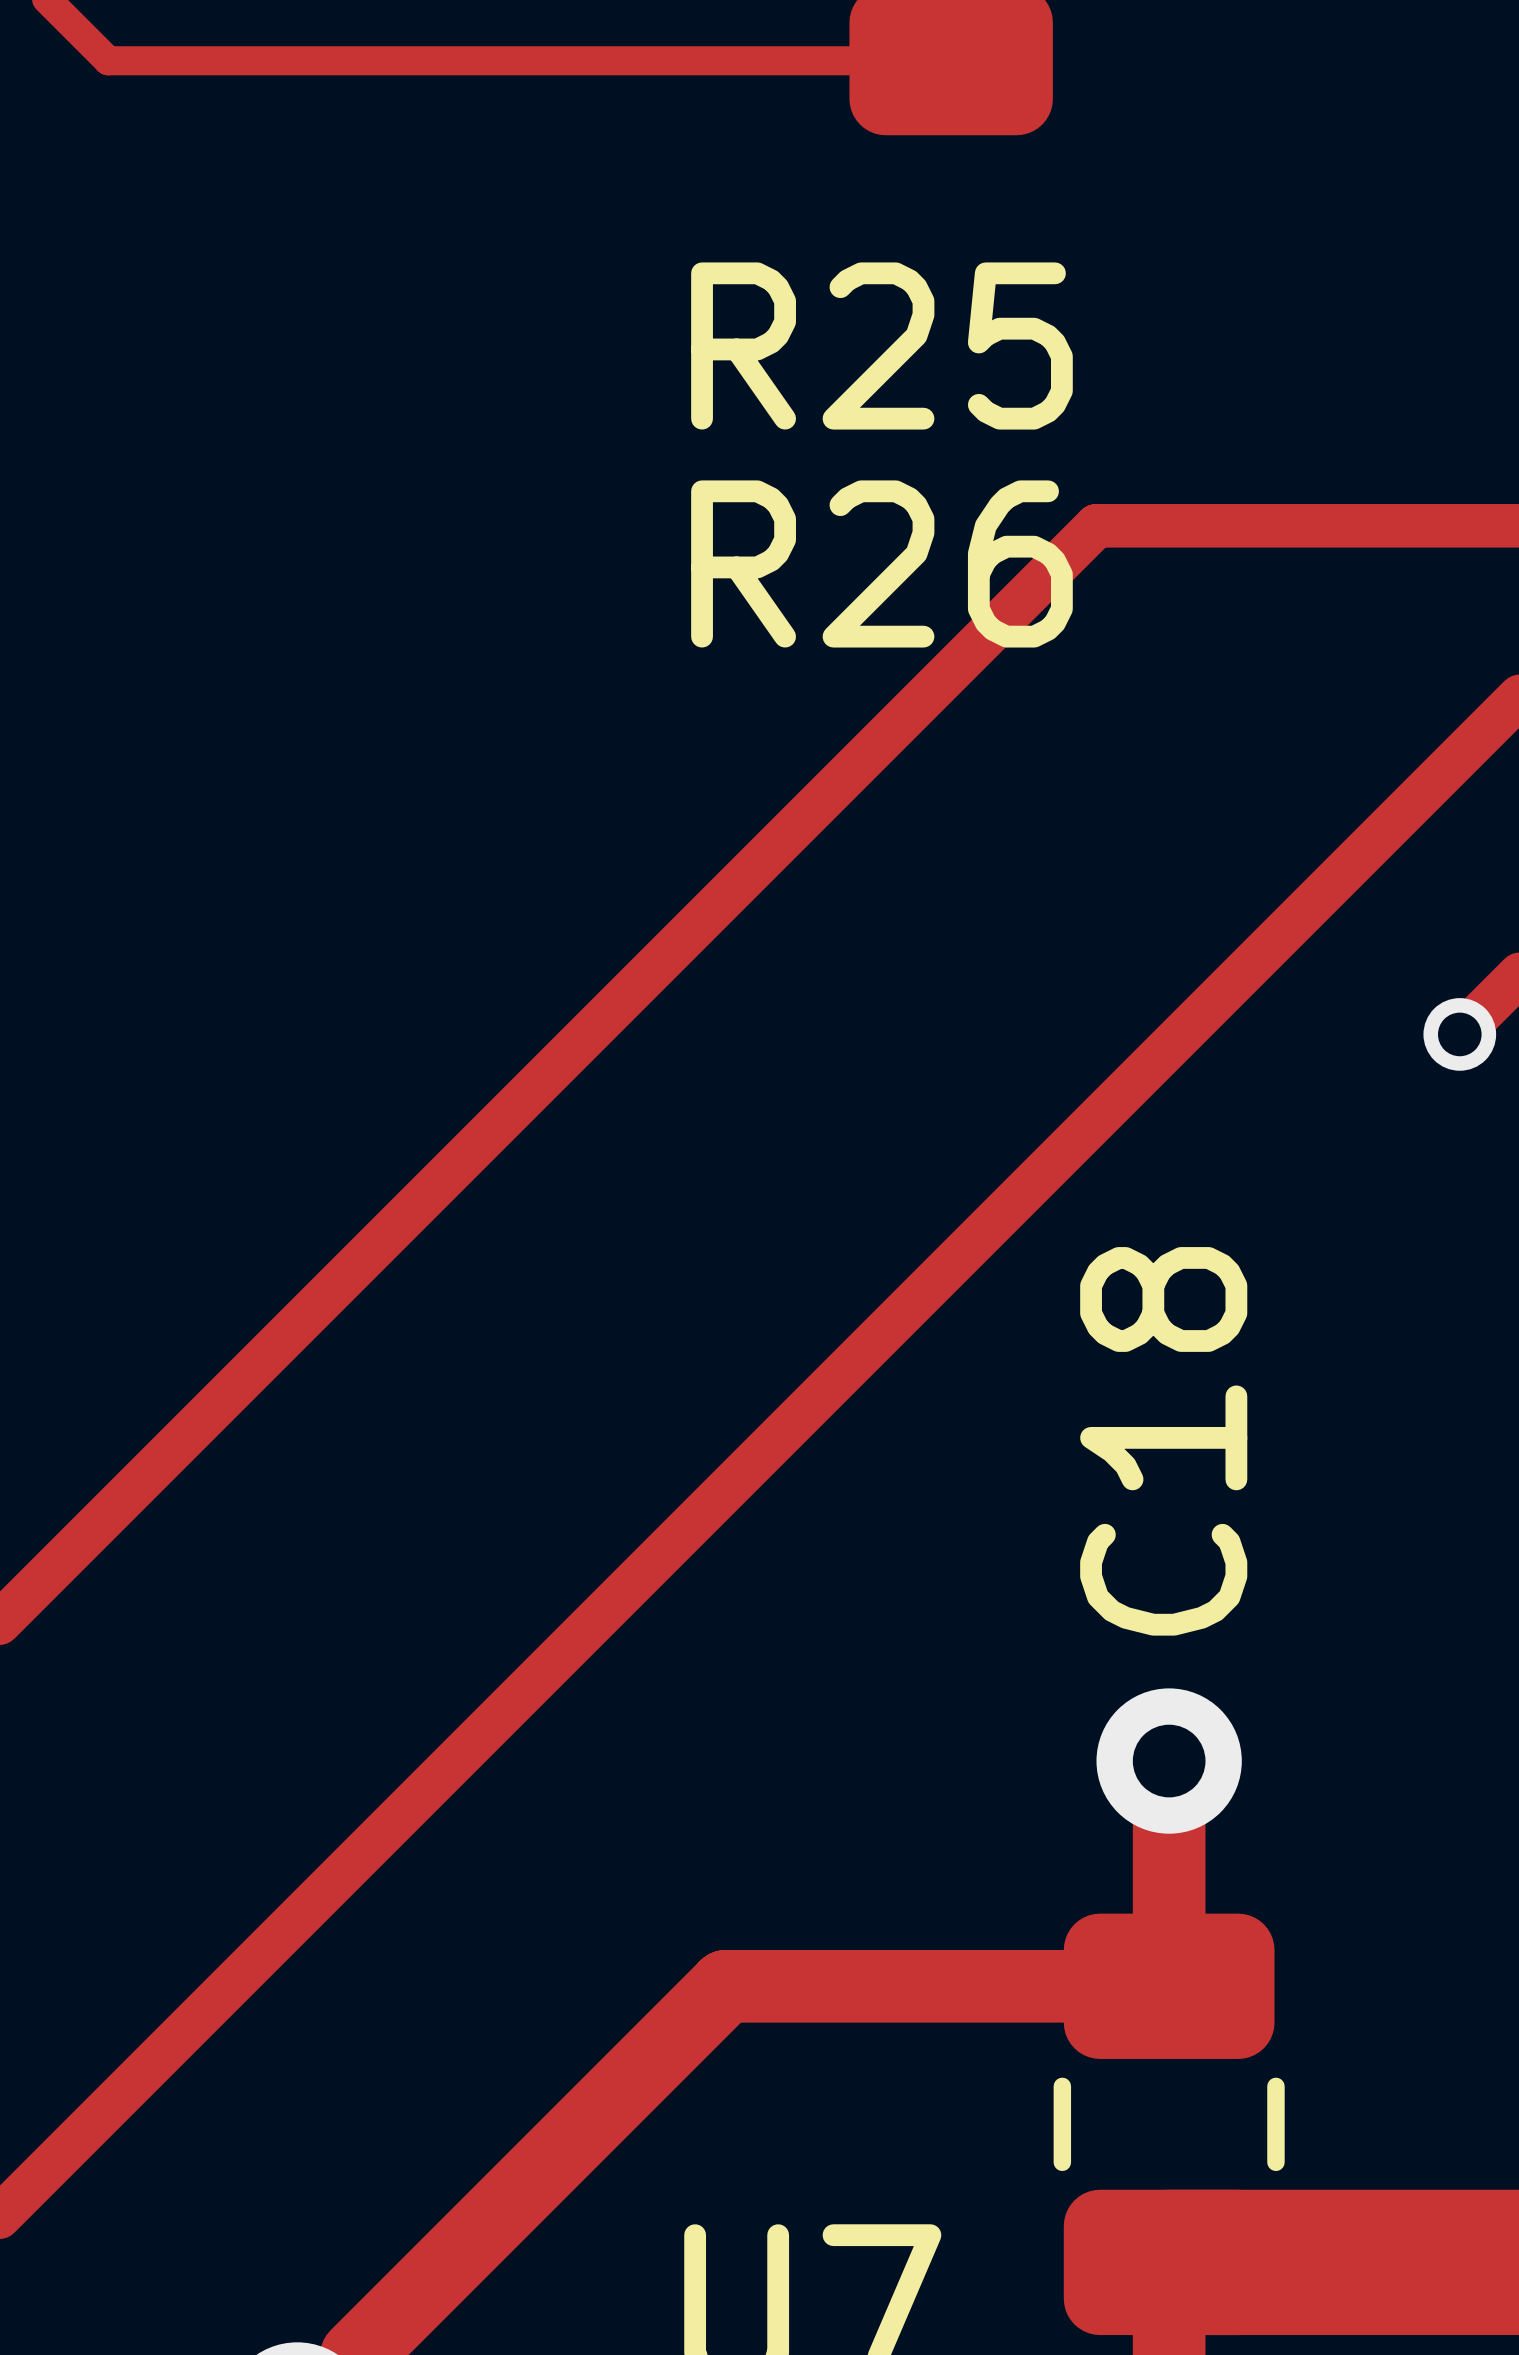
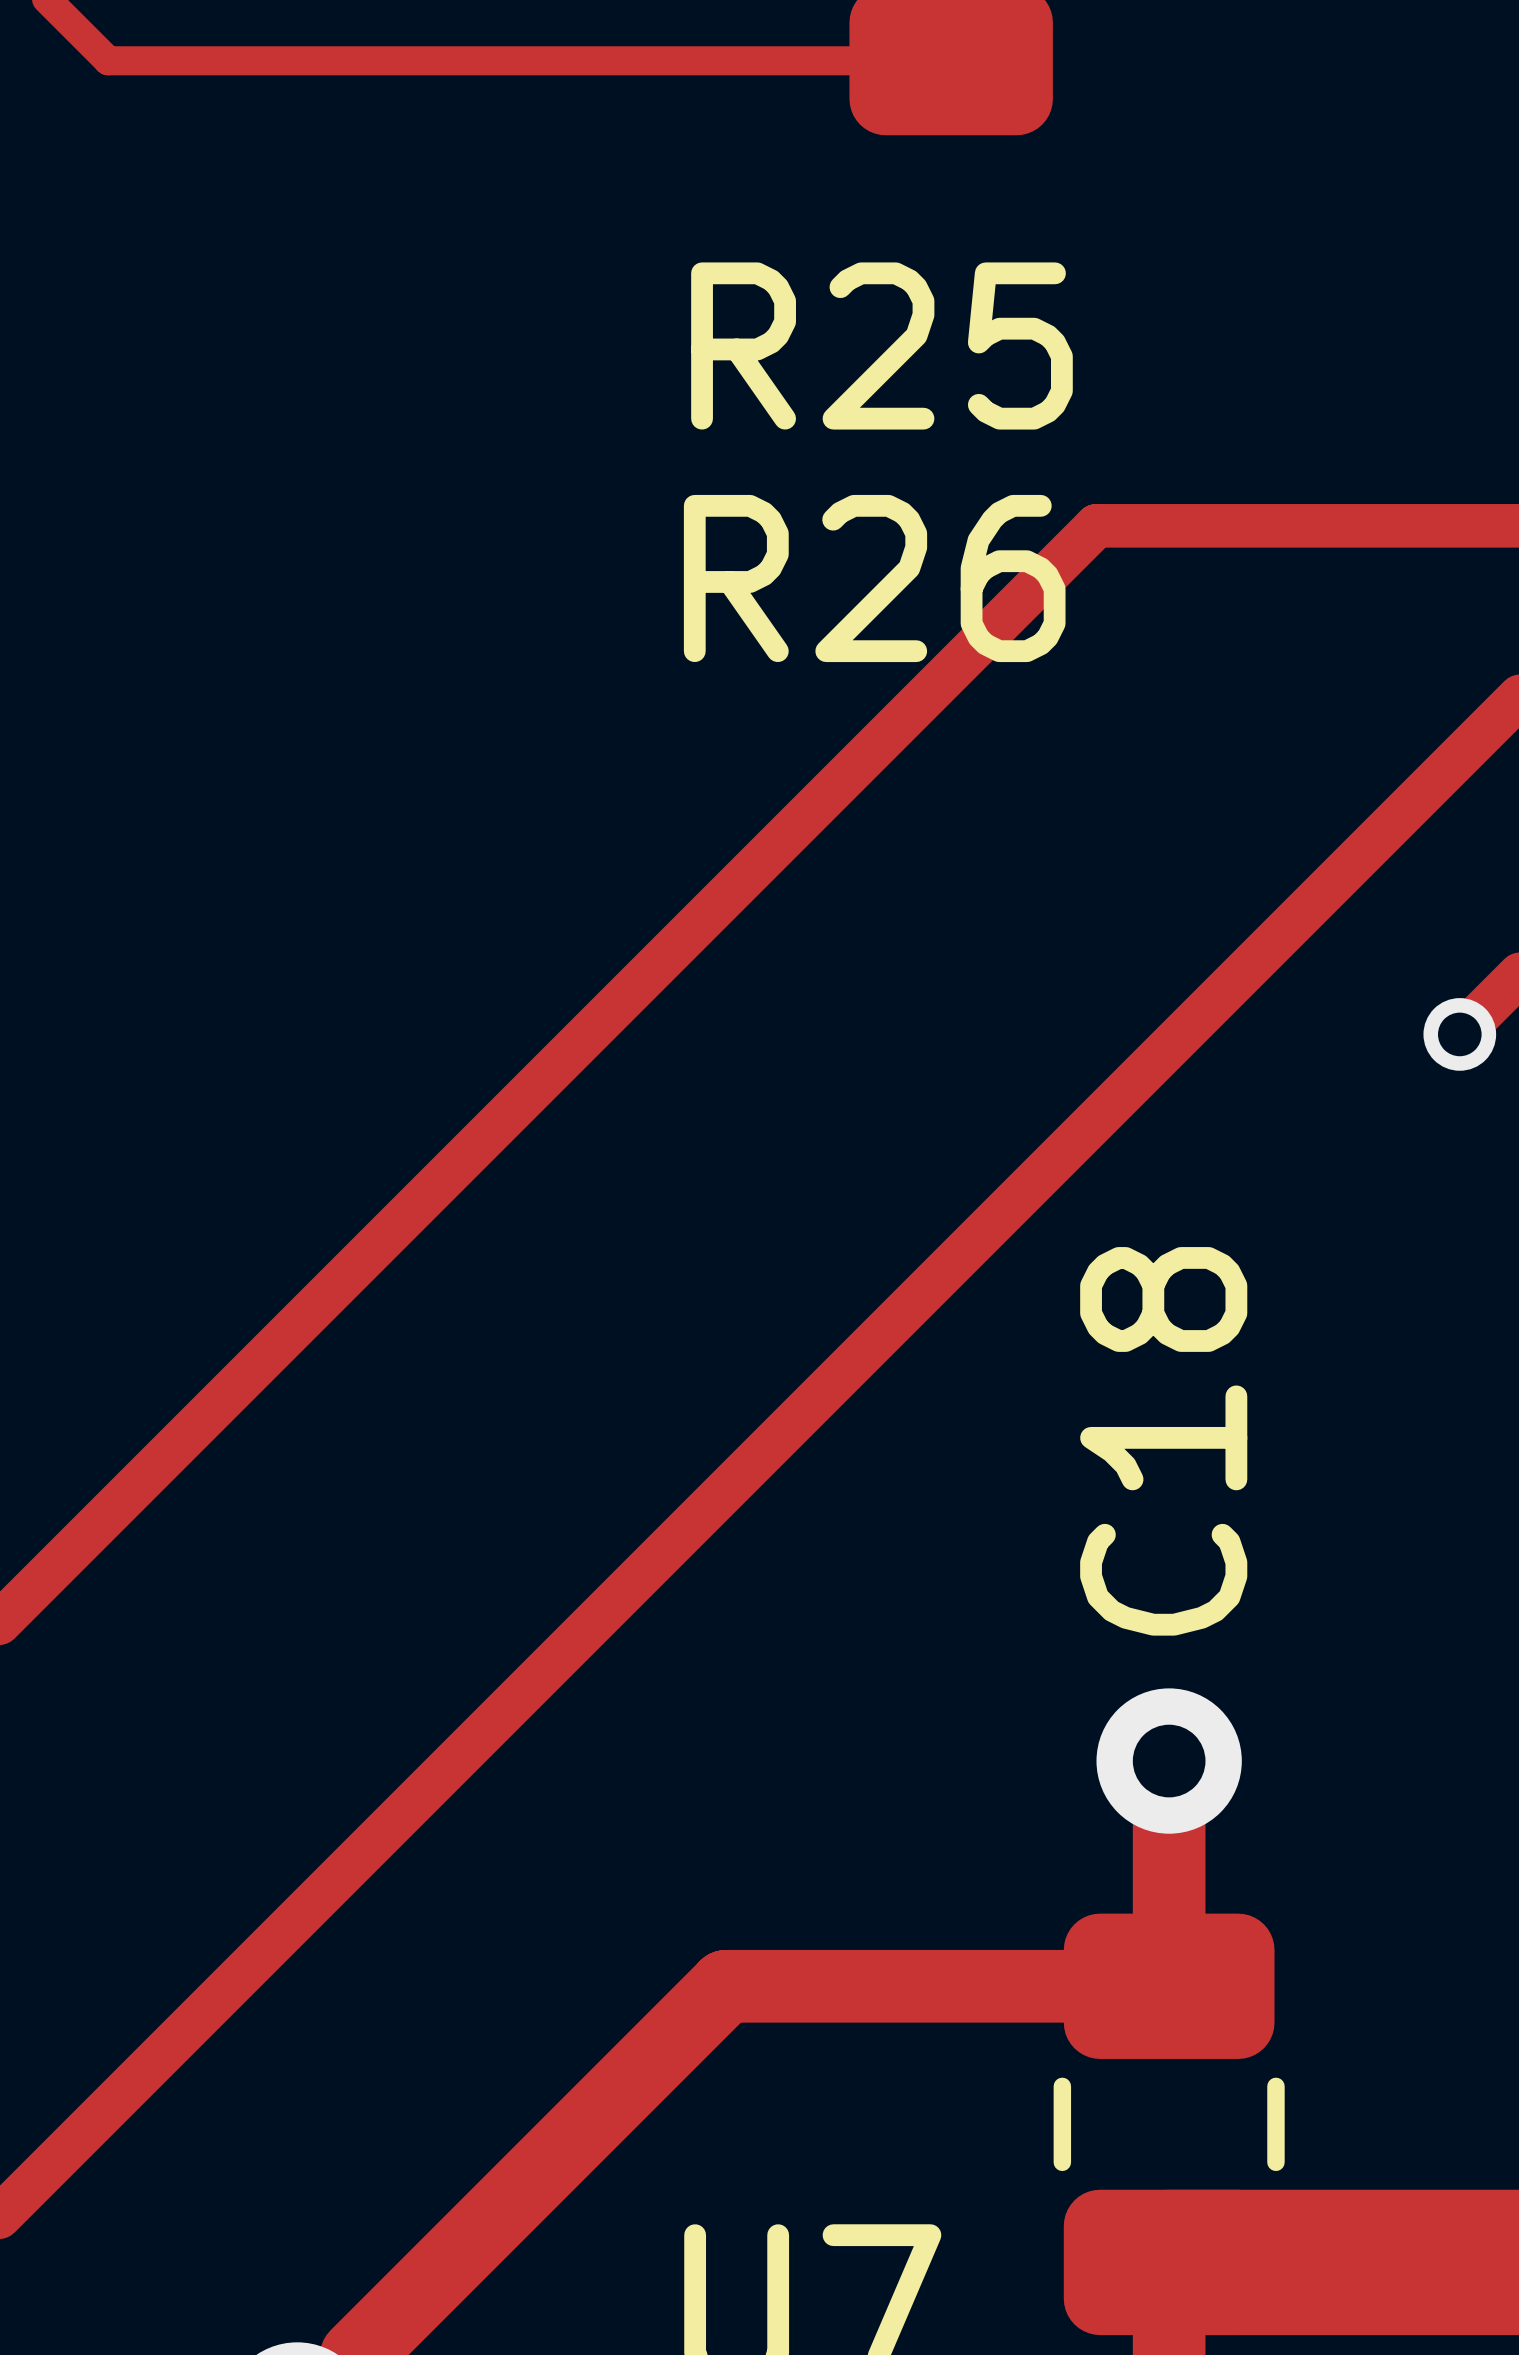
R26 name position: R26 (881, 563) -> R26 (874, 578)

